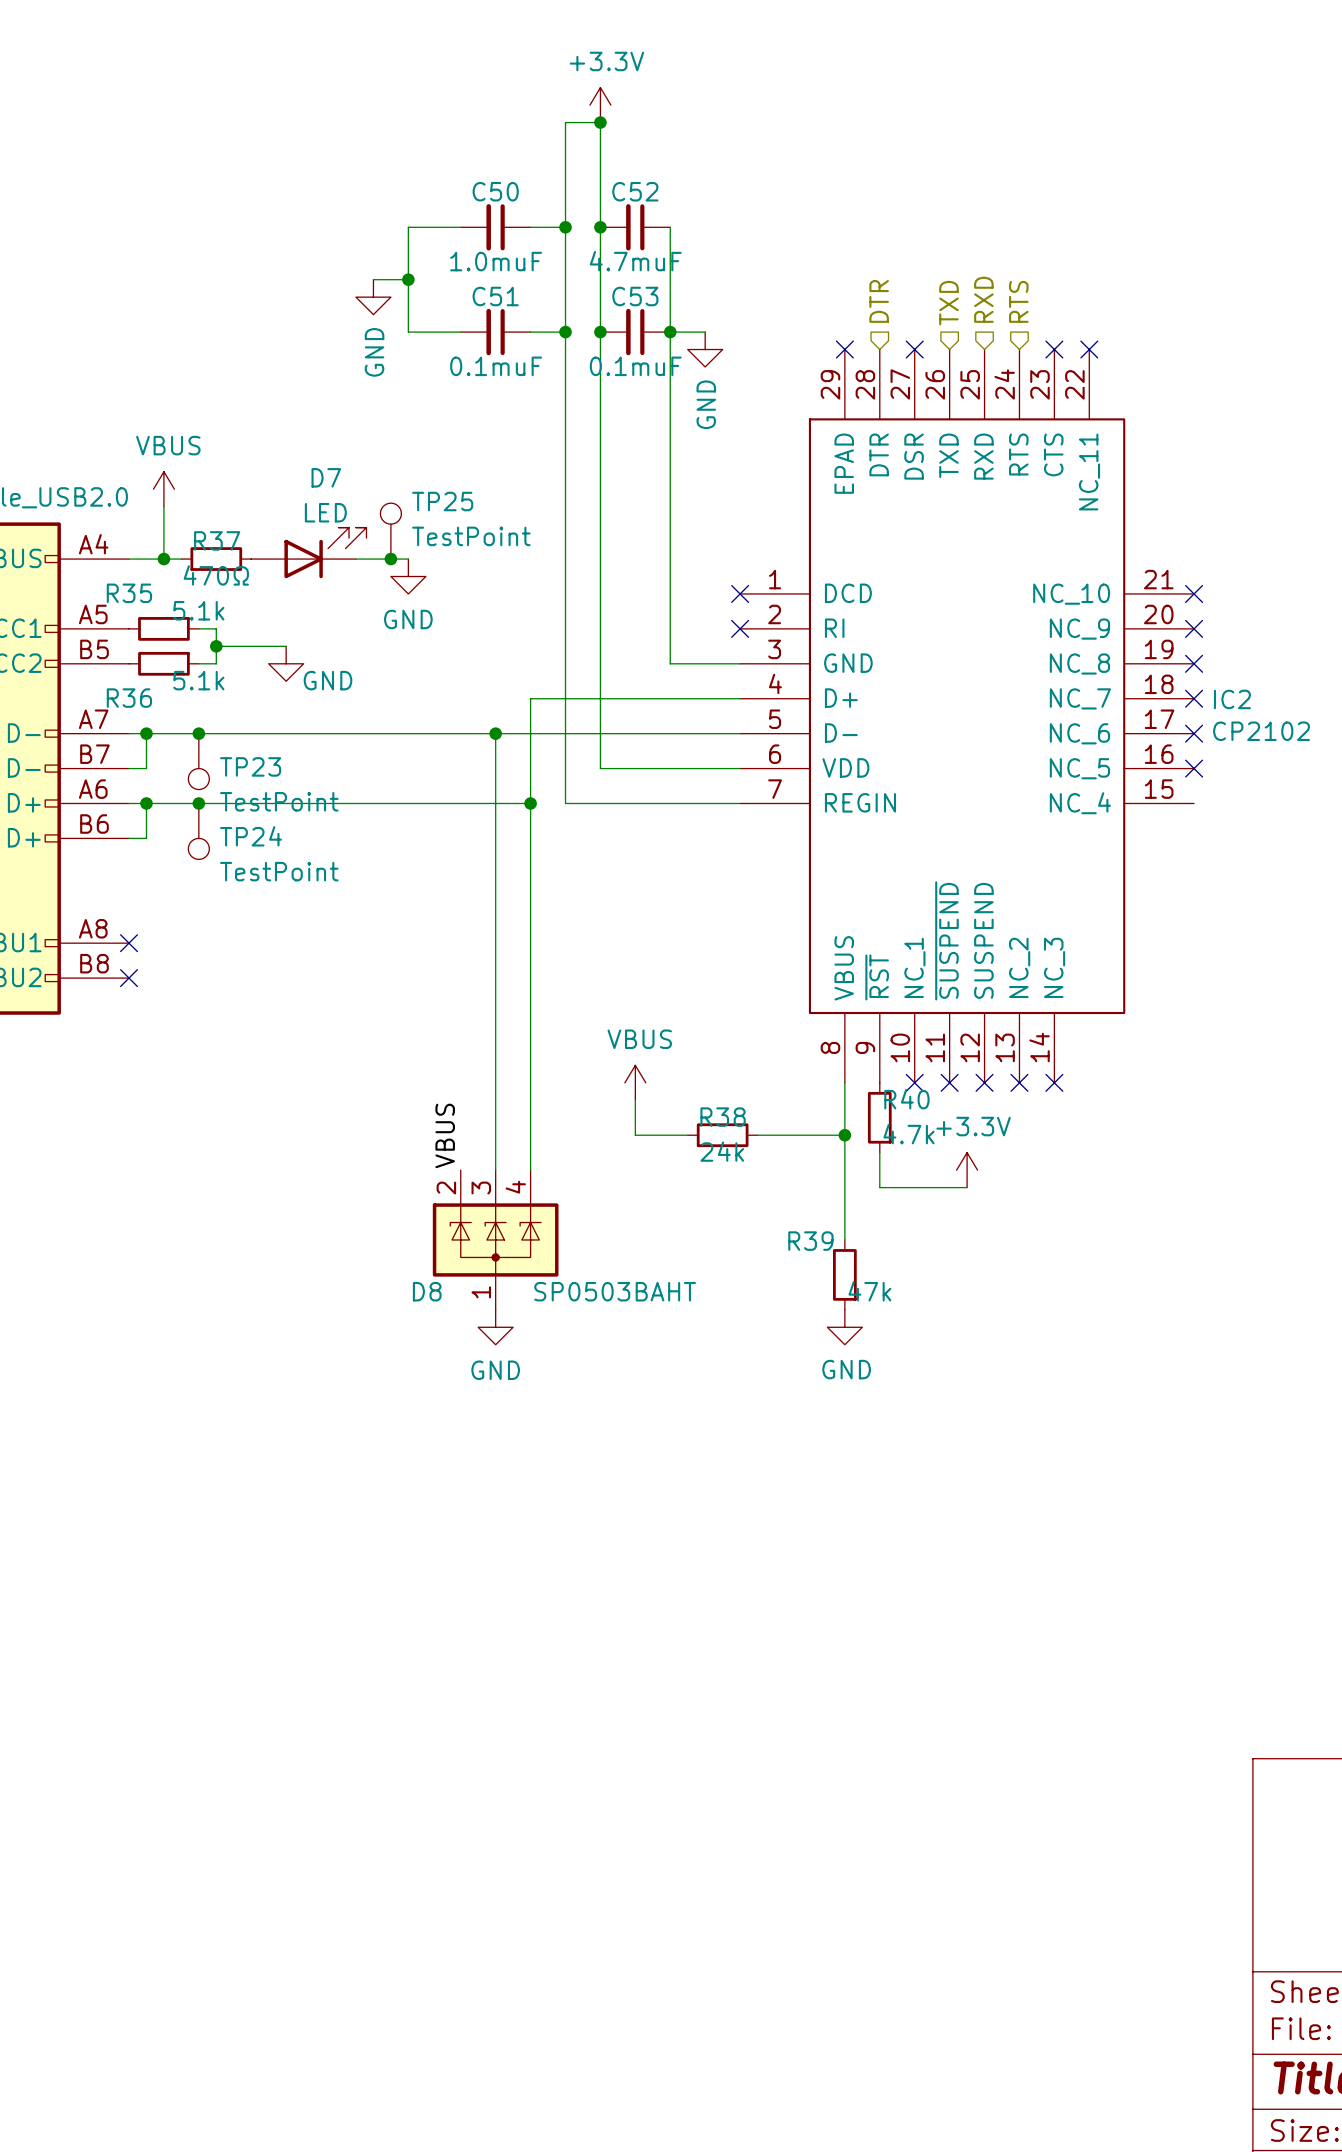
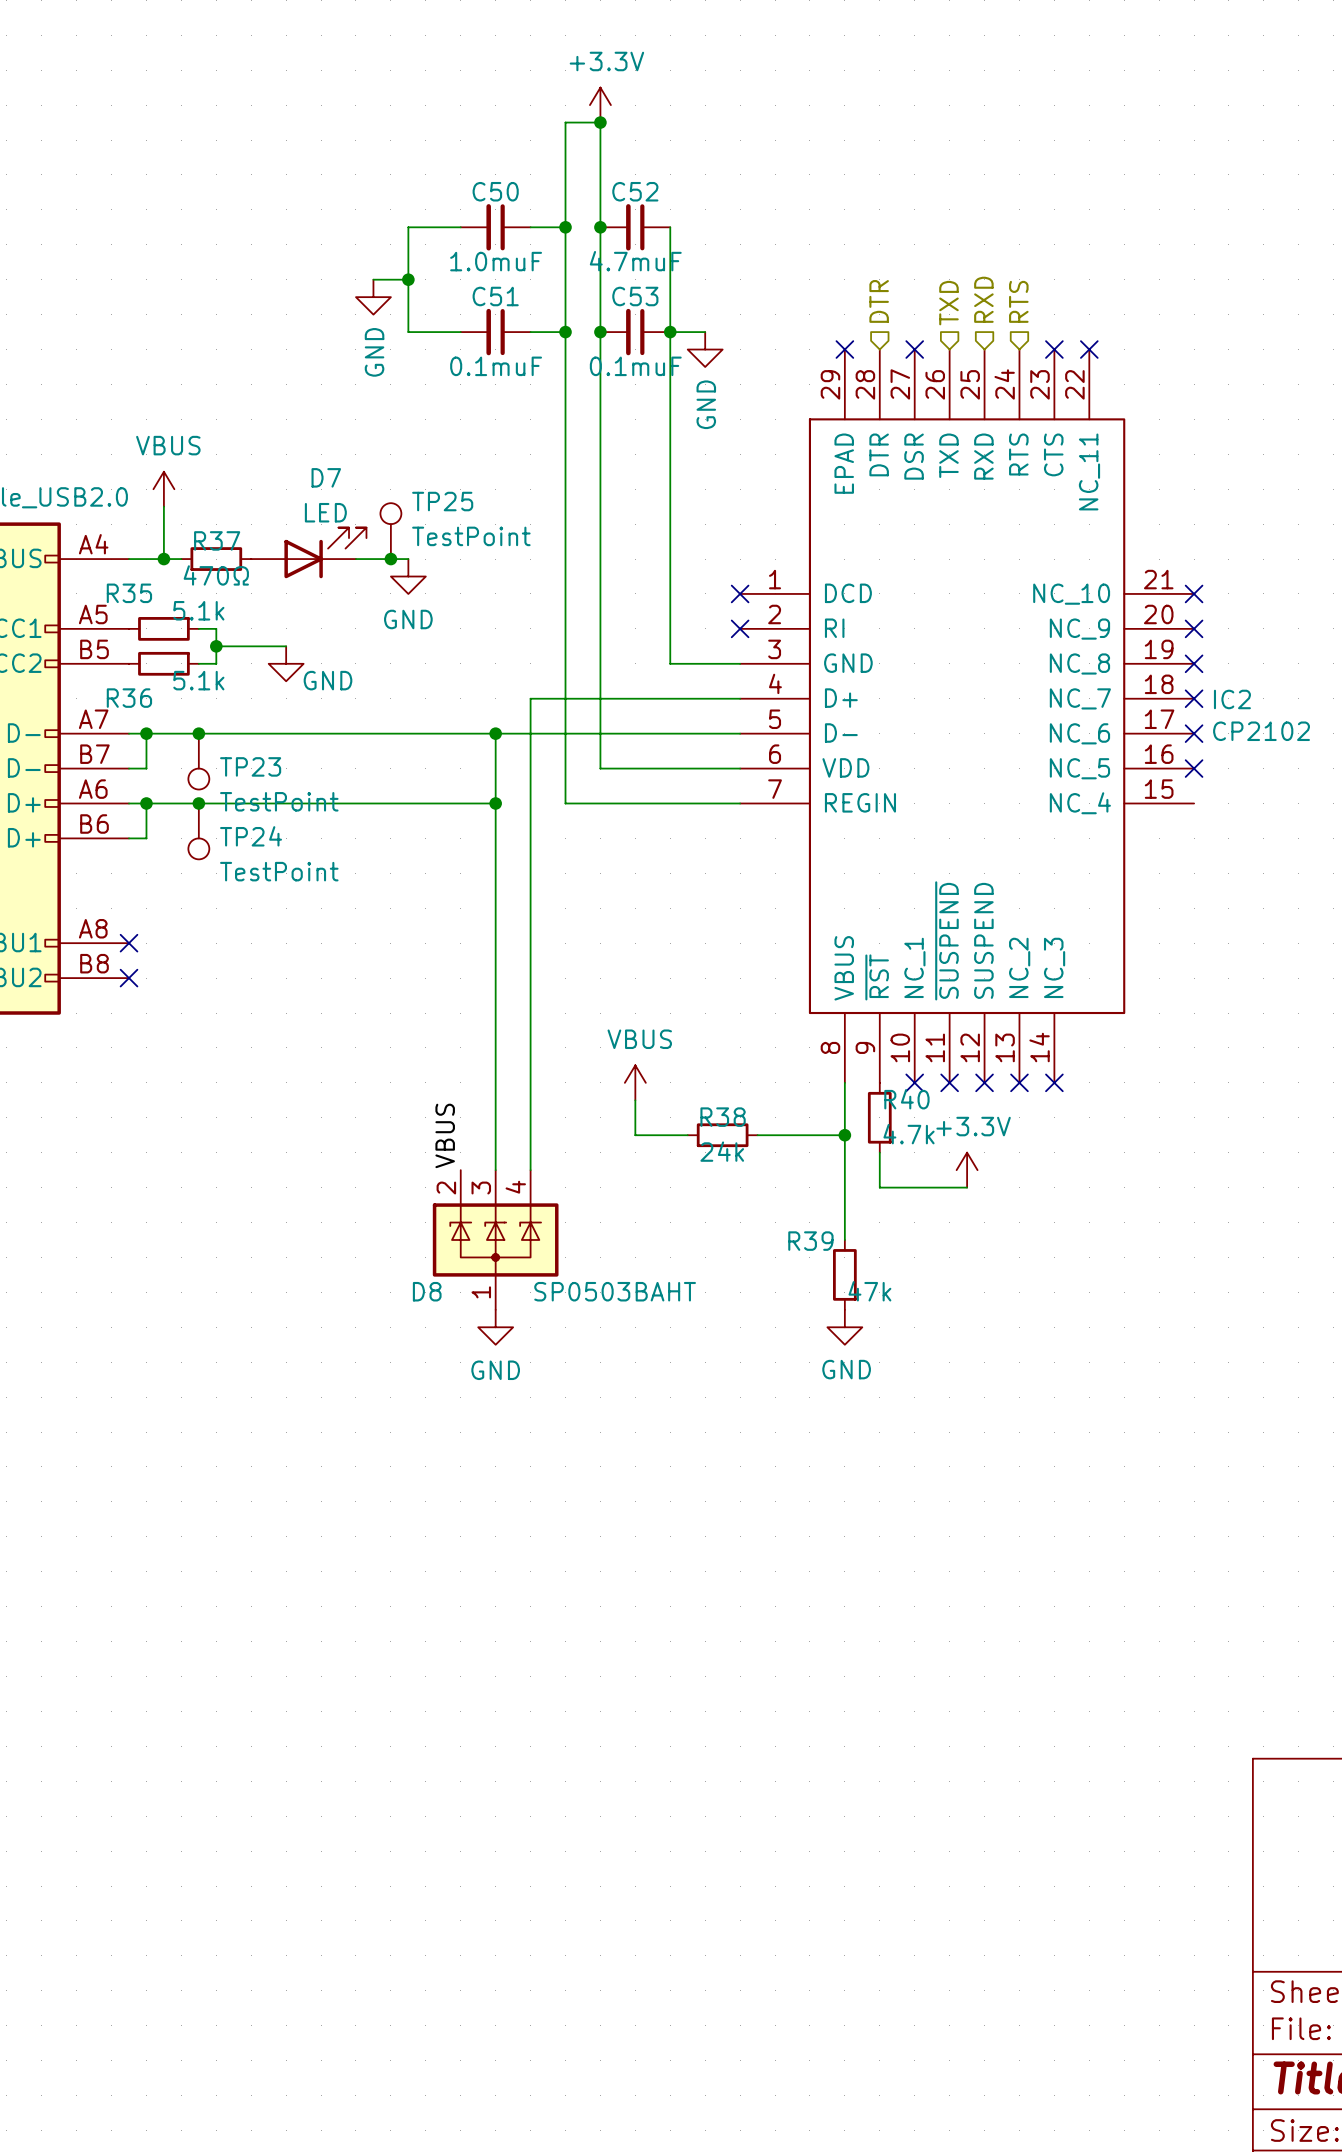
wire: (495, 803) (530, 803) -> none
junction position: (530, 803) -> (495, 803)

